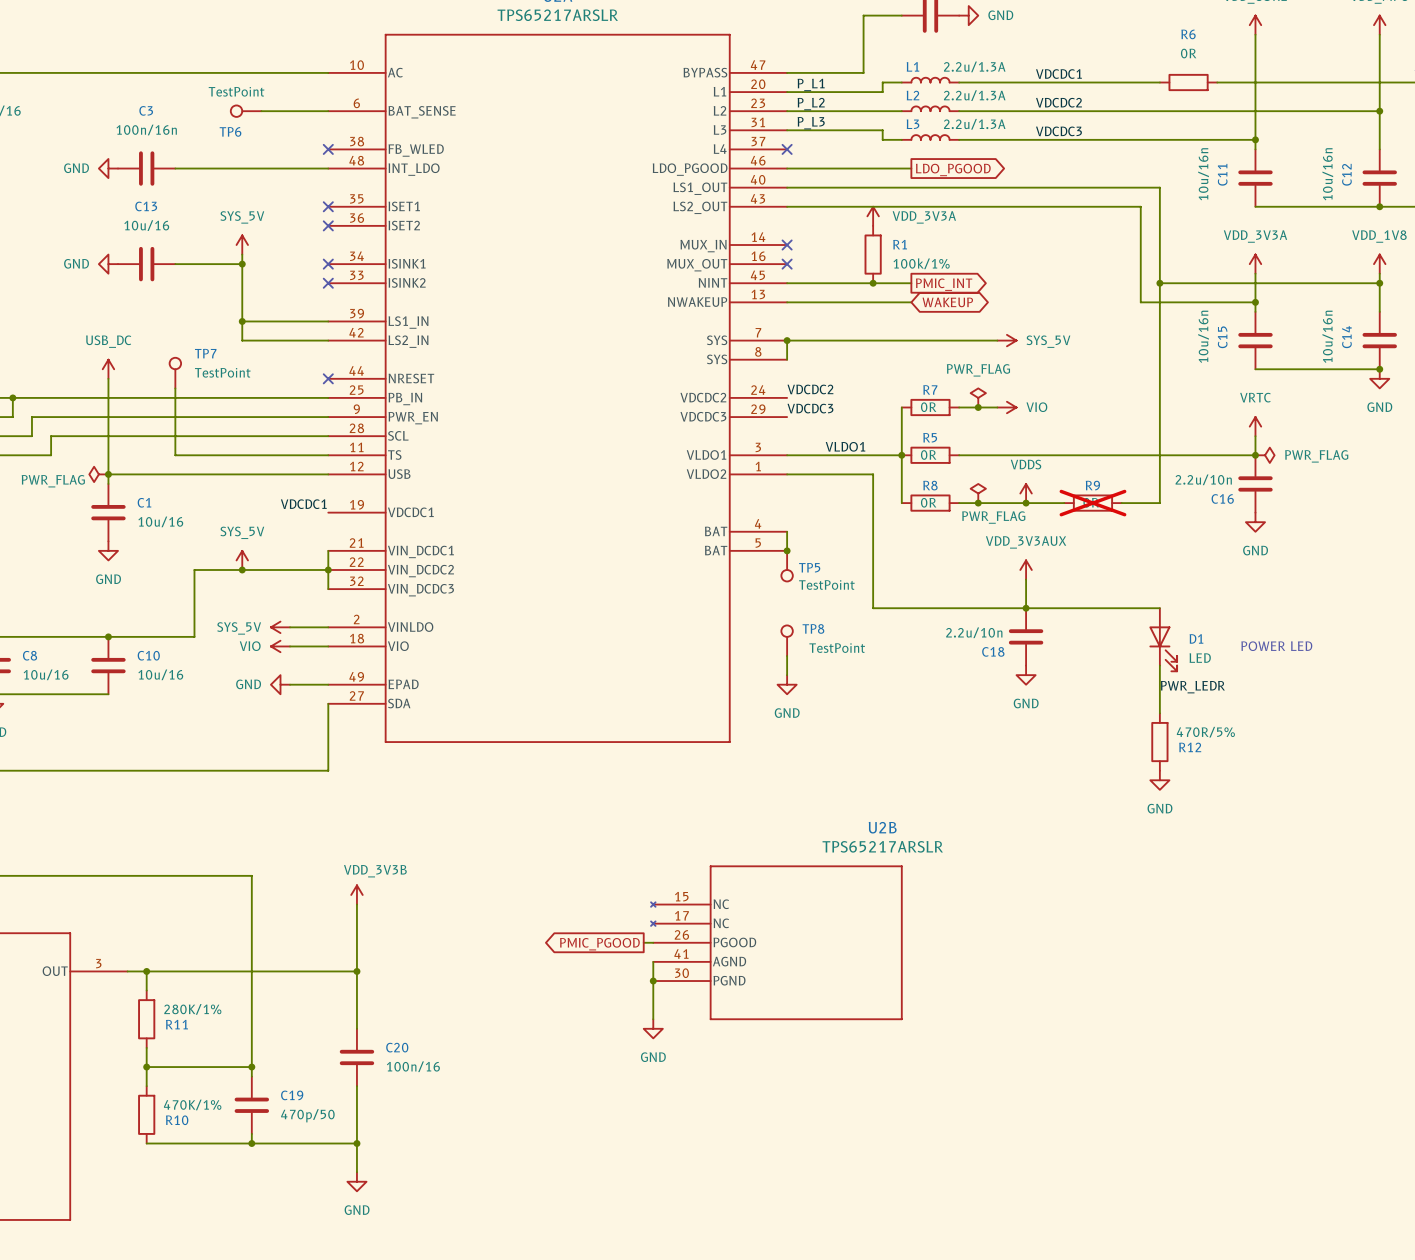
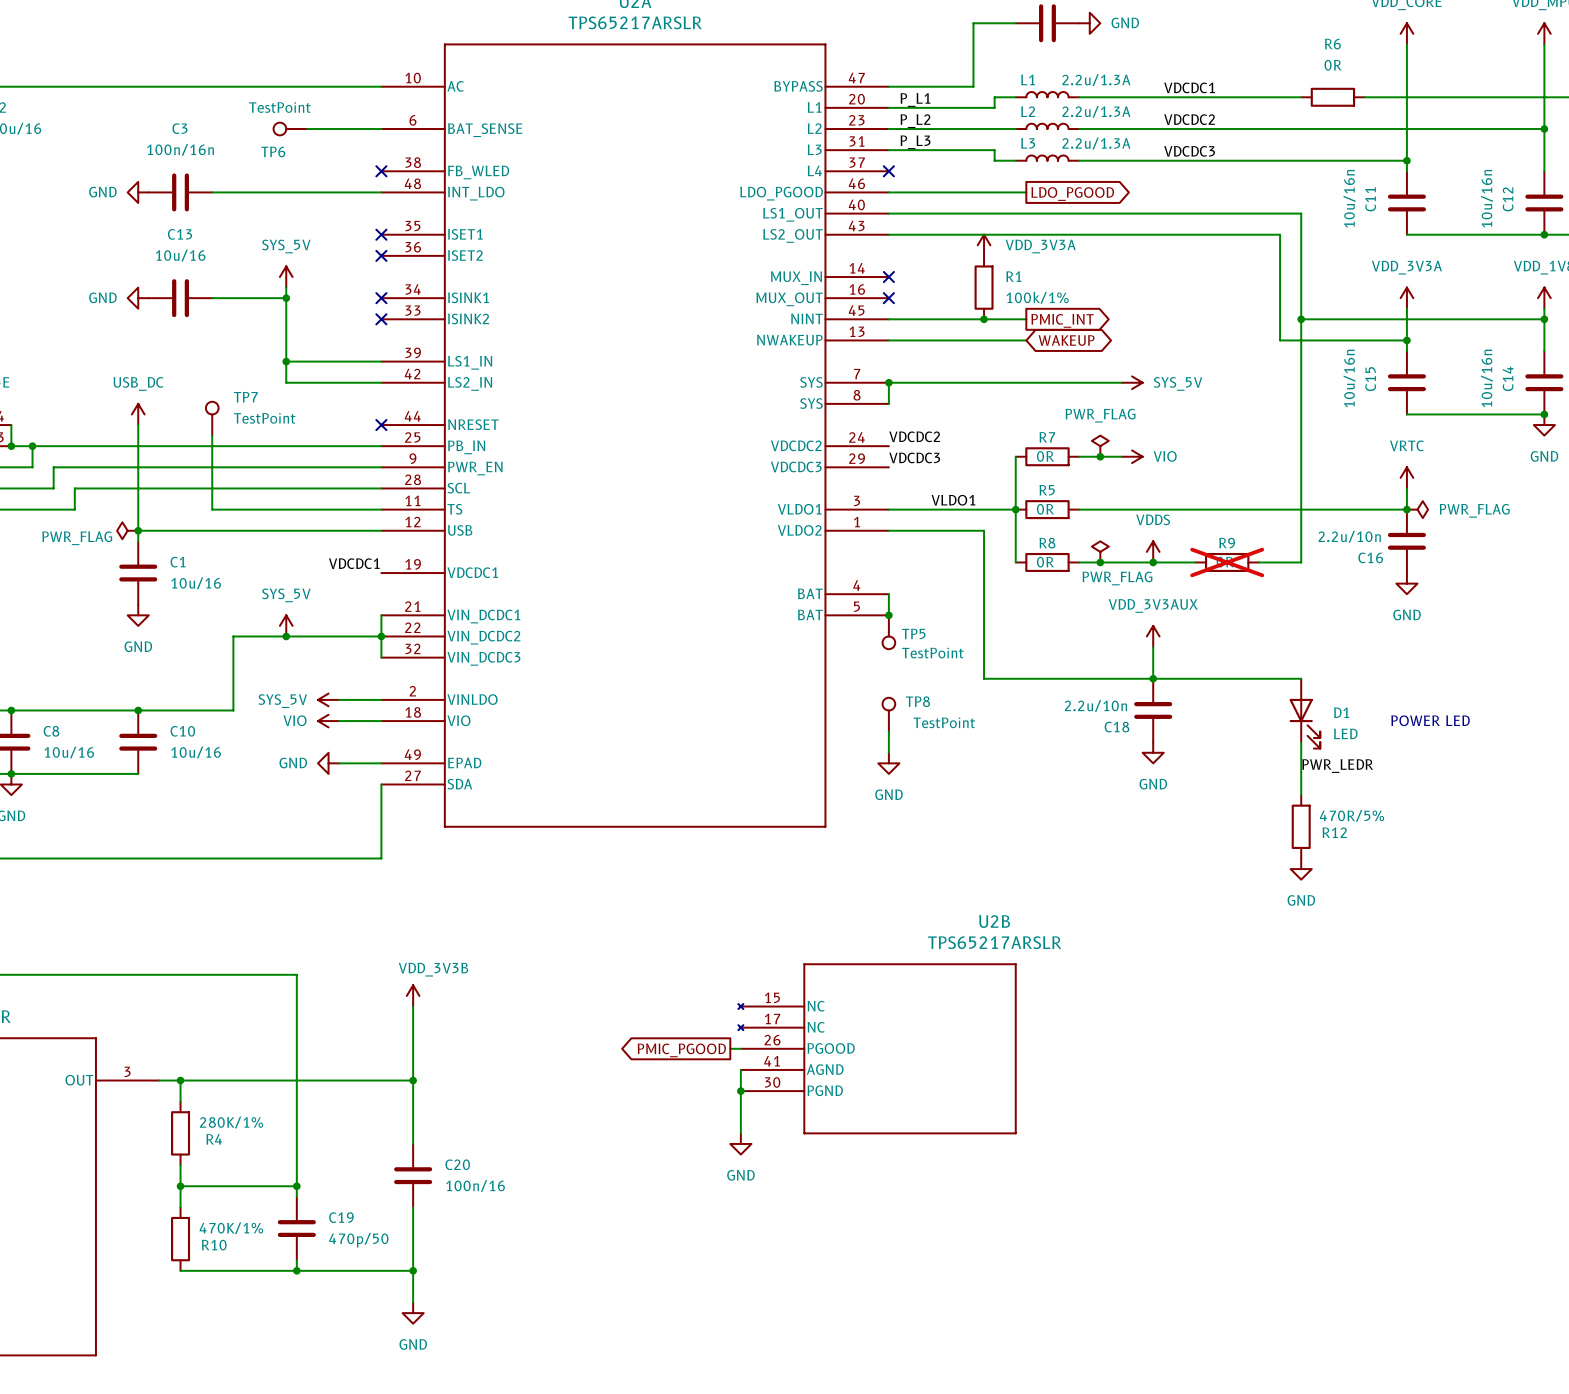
R11 name: R11 (176, 1024) -> R4 (214, 1139)

